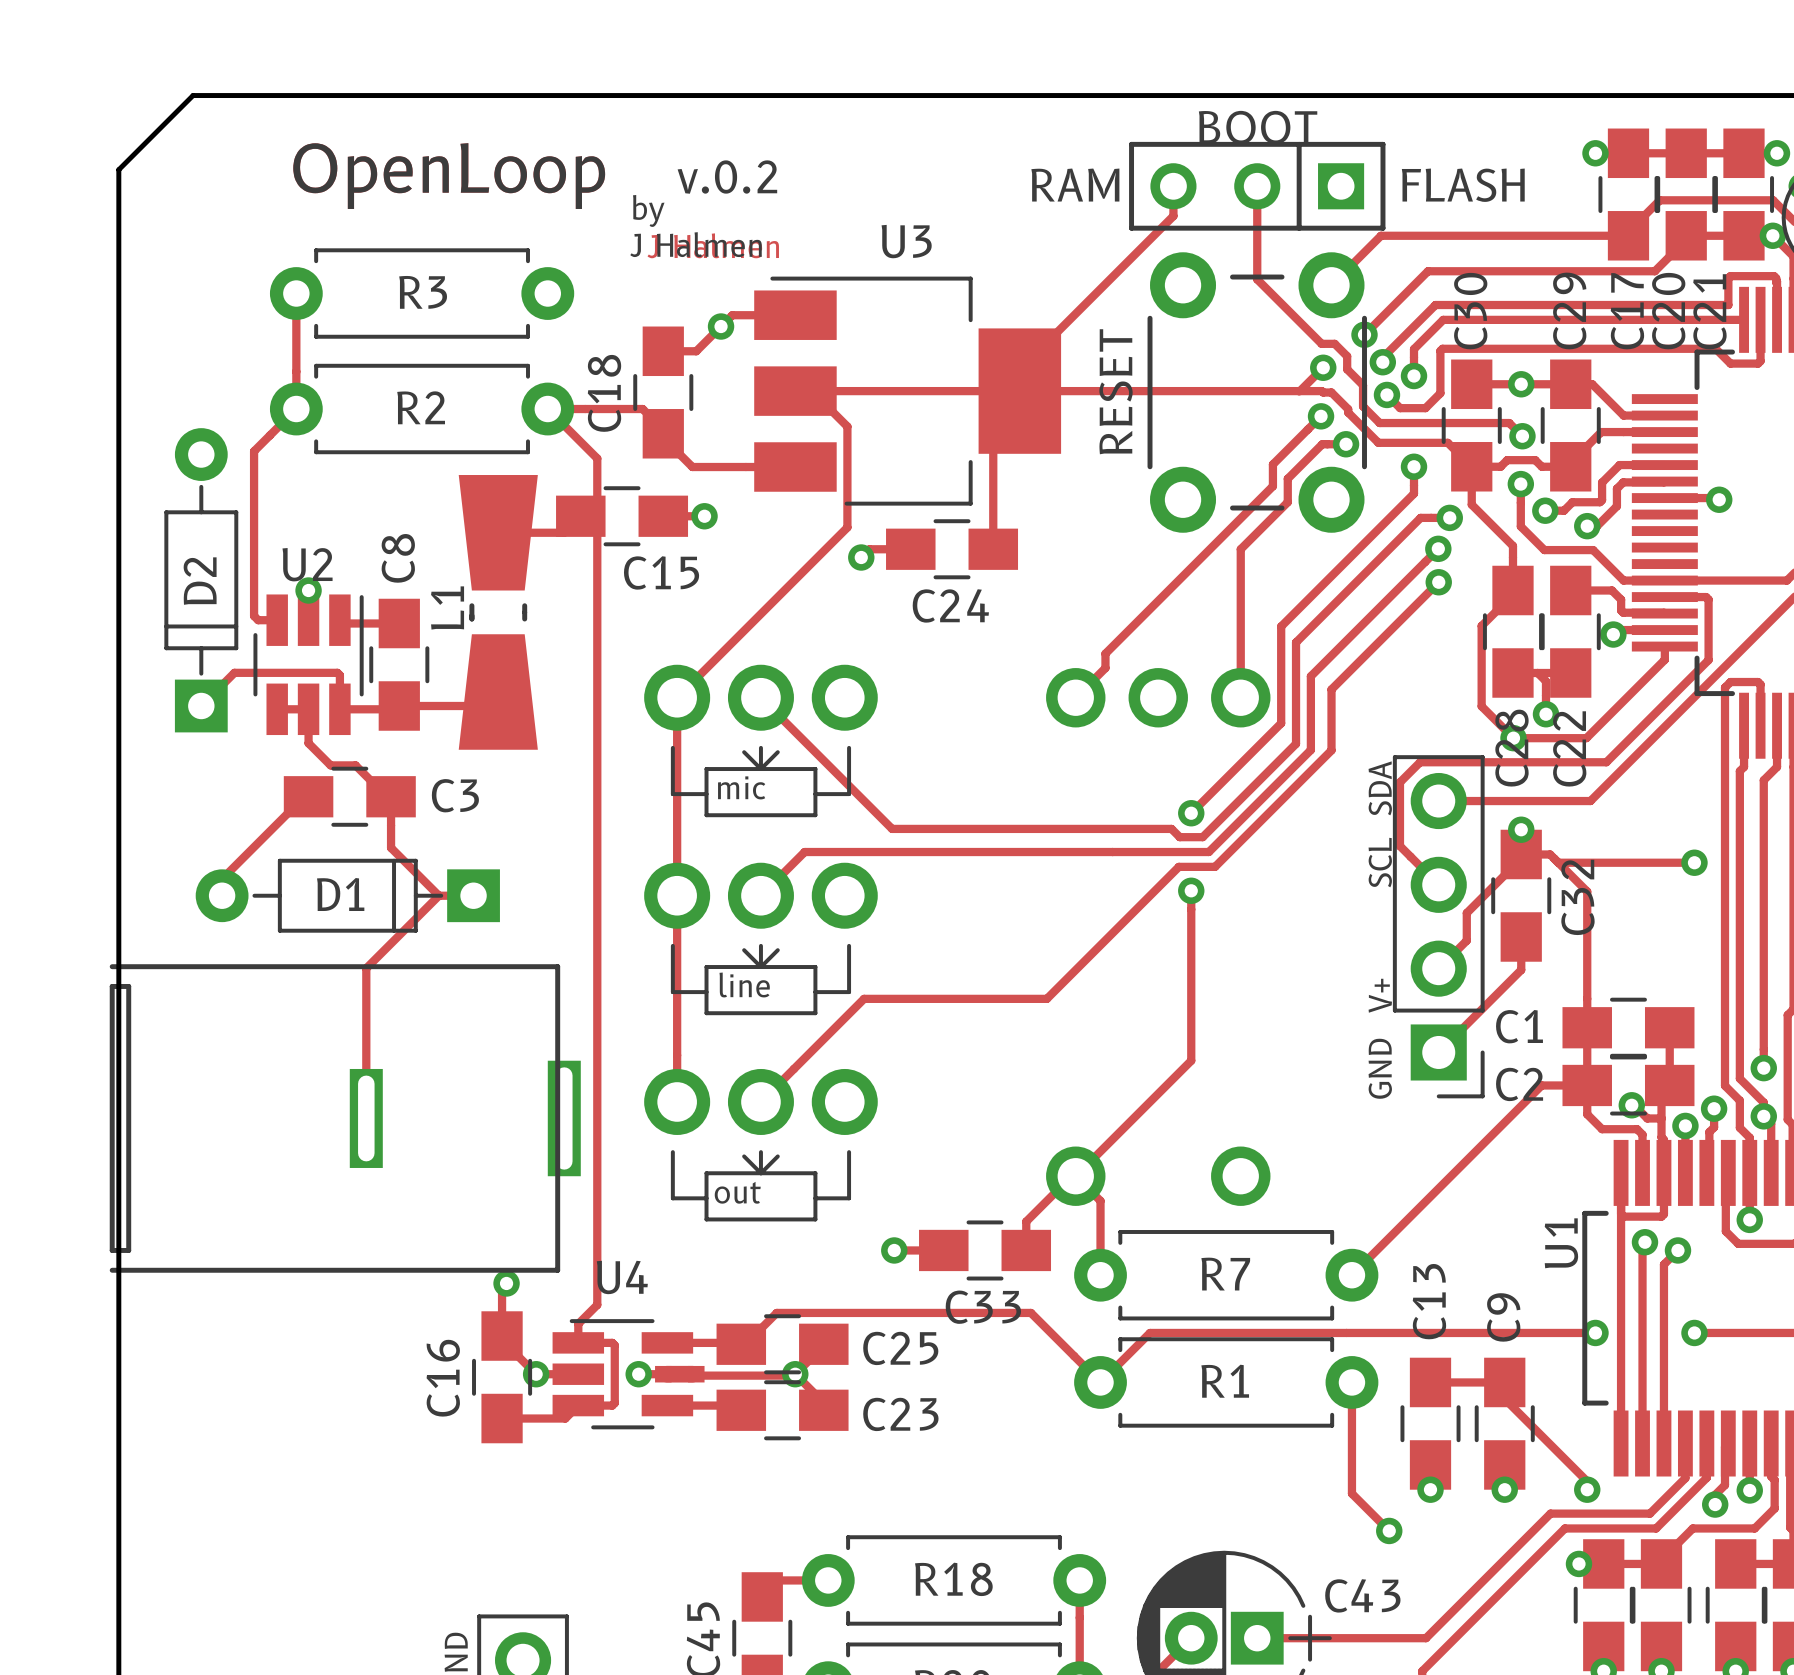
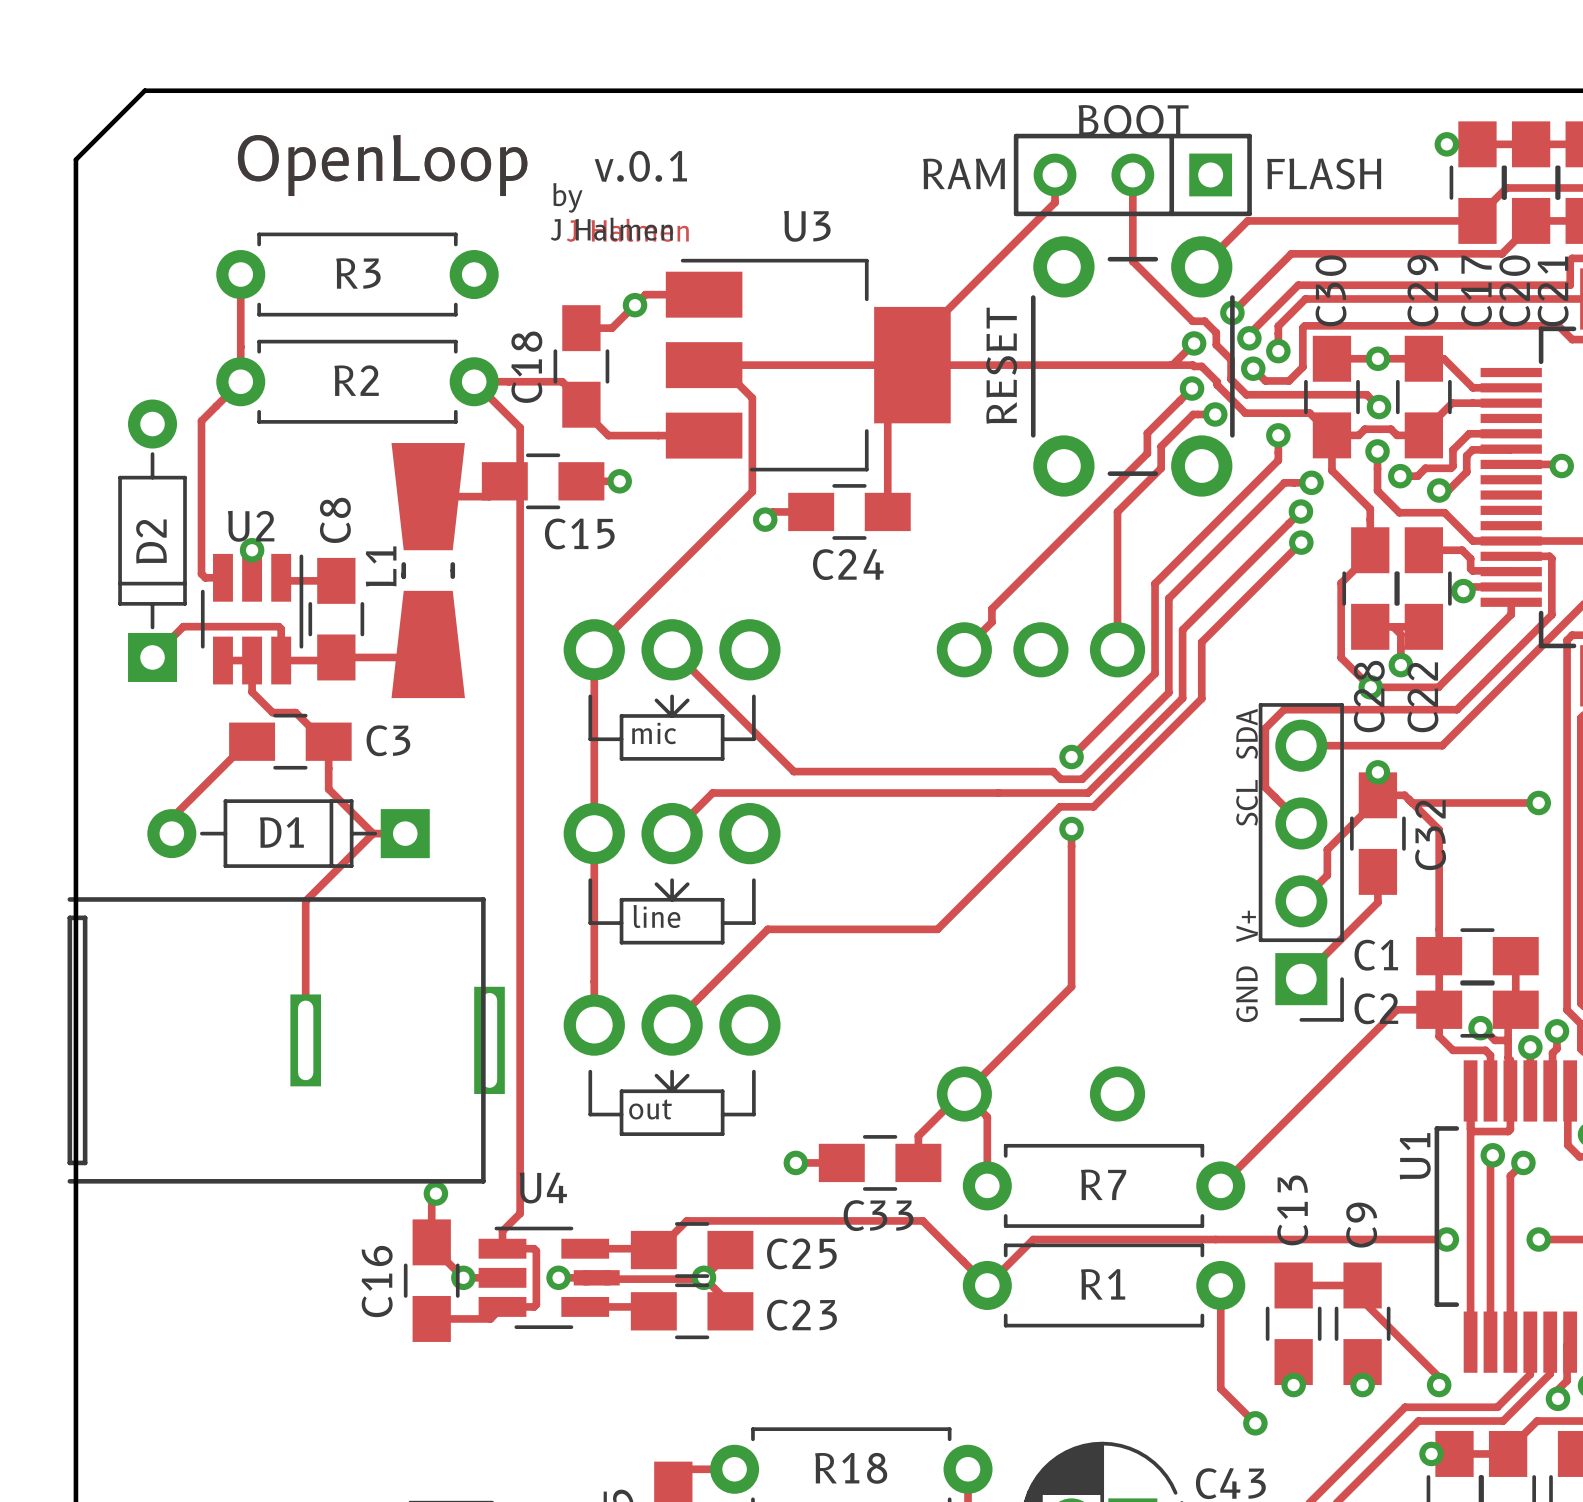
text: v.0.2 (727, 177) -> v.0.1 (640, 166)

